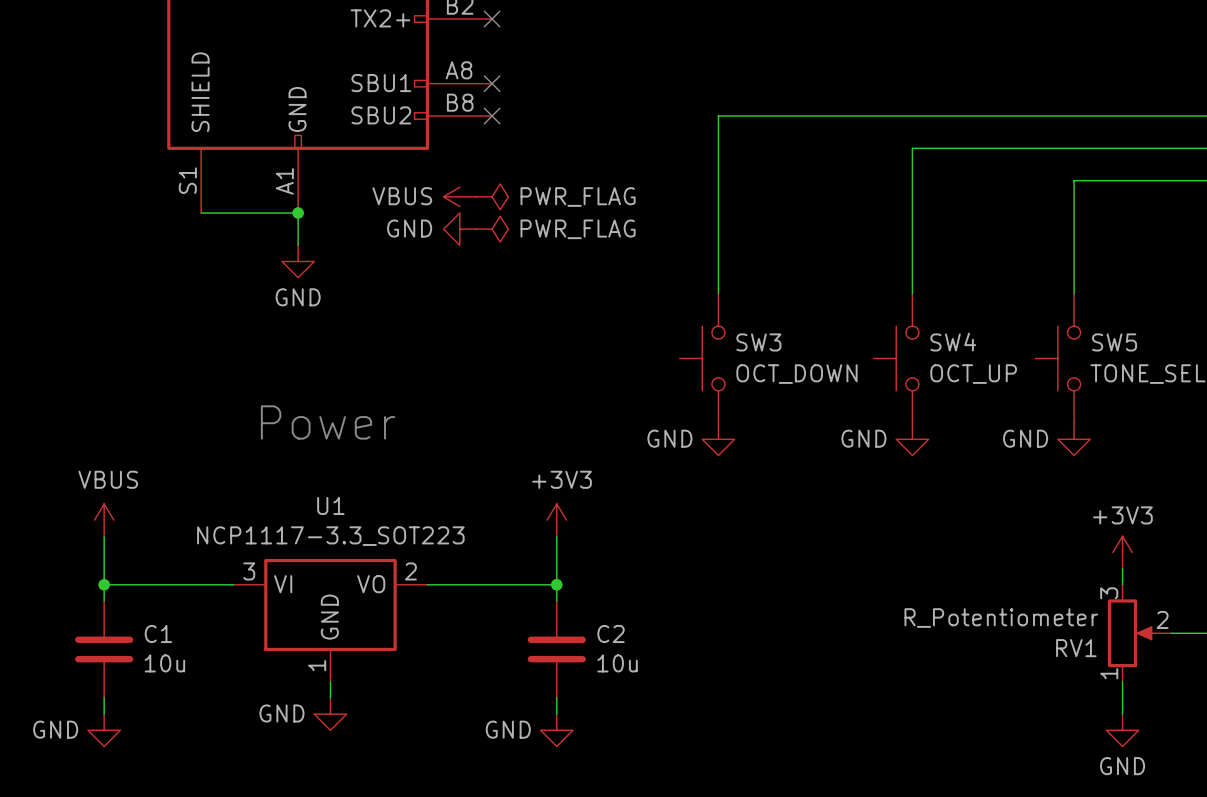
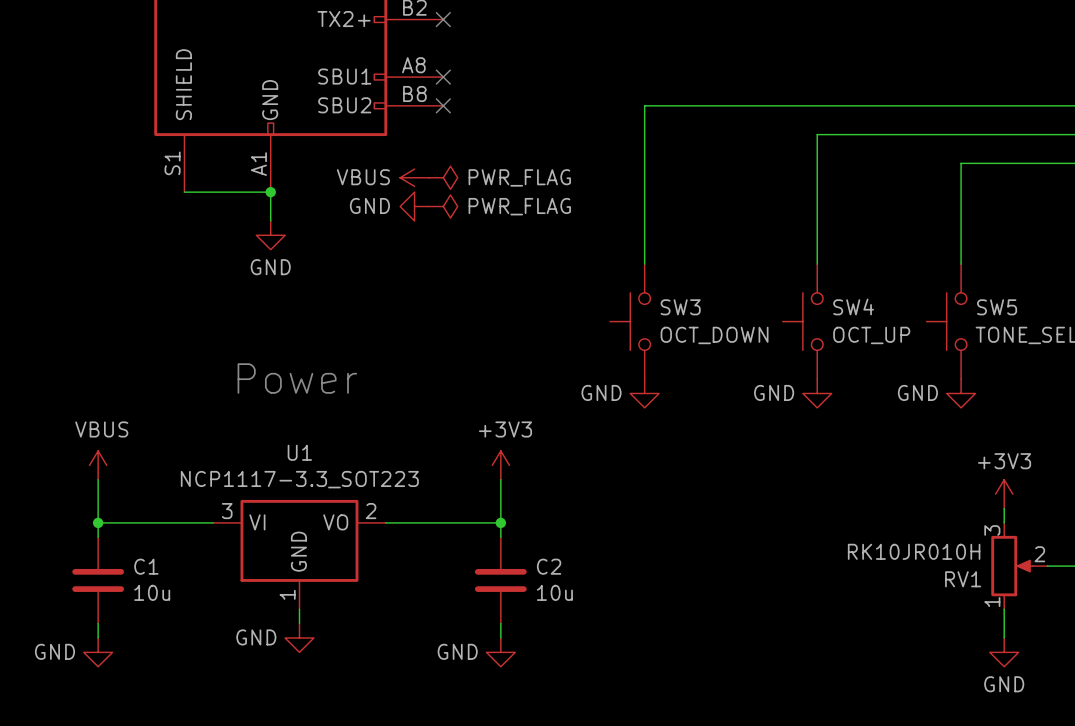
RV1 value: R_Potentiometer (1001, 618) -> RK10JR010H (914, 551)

